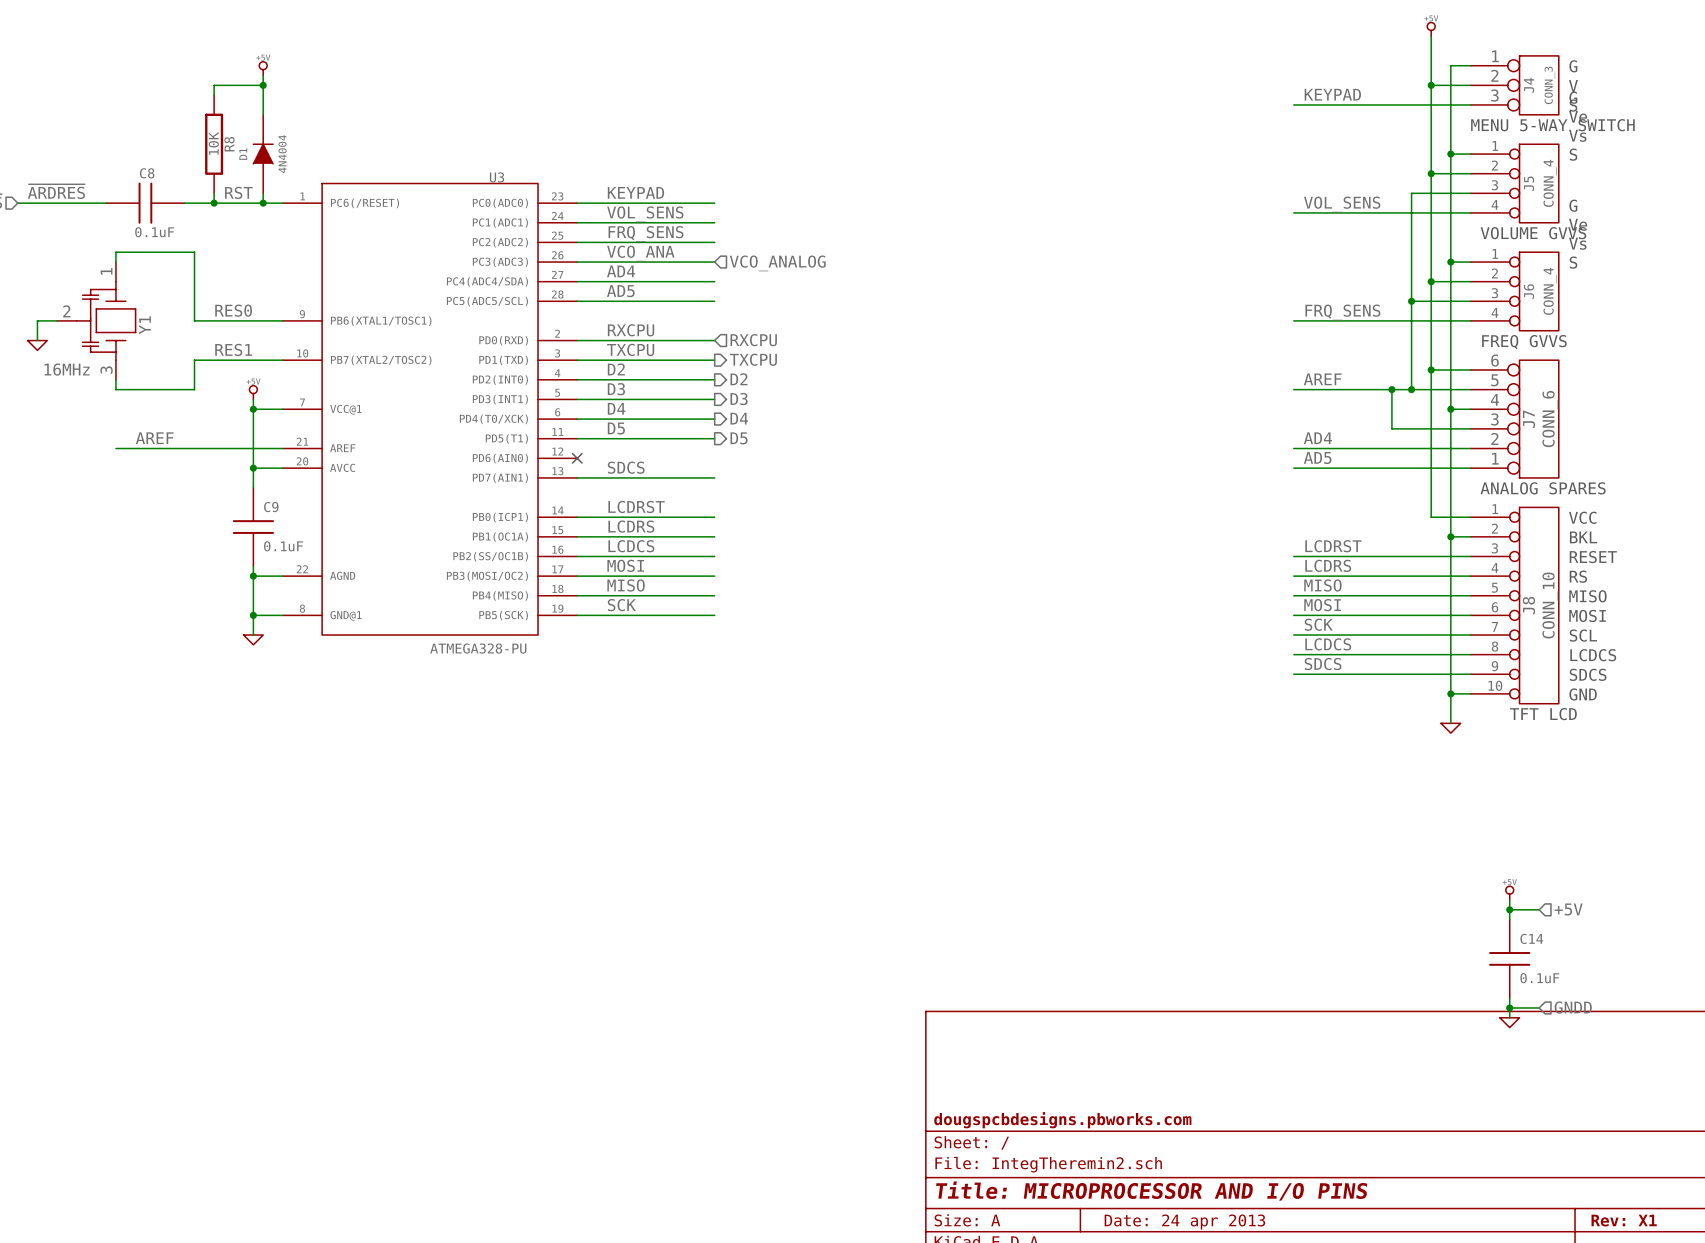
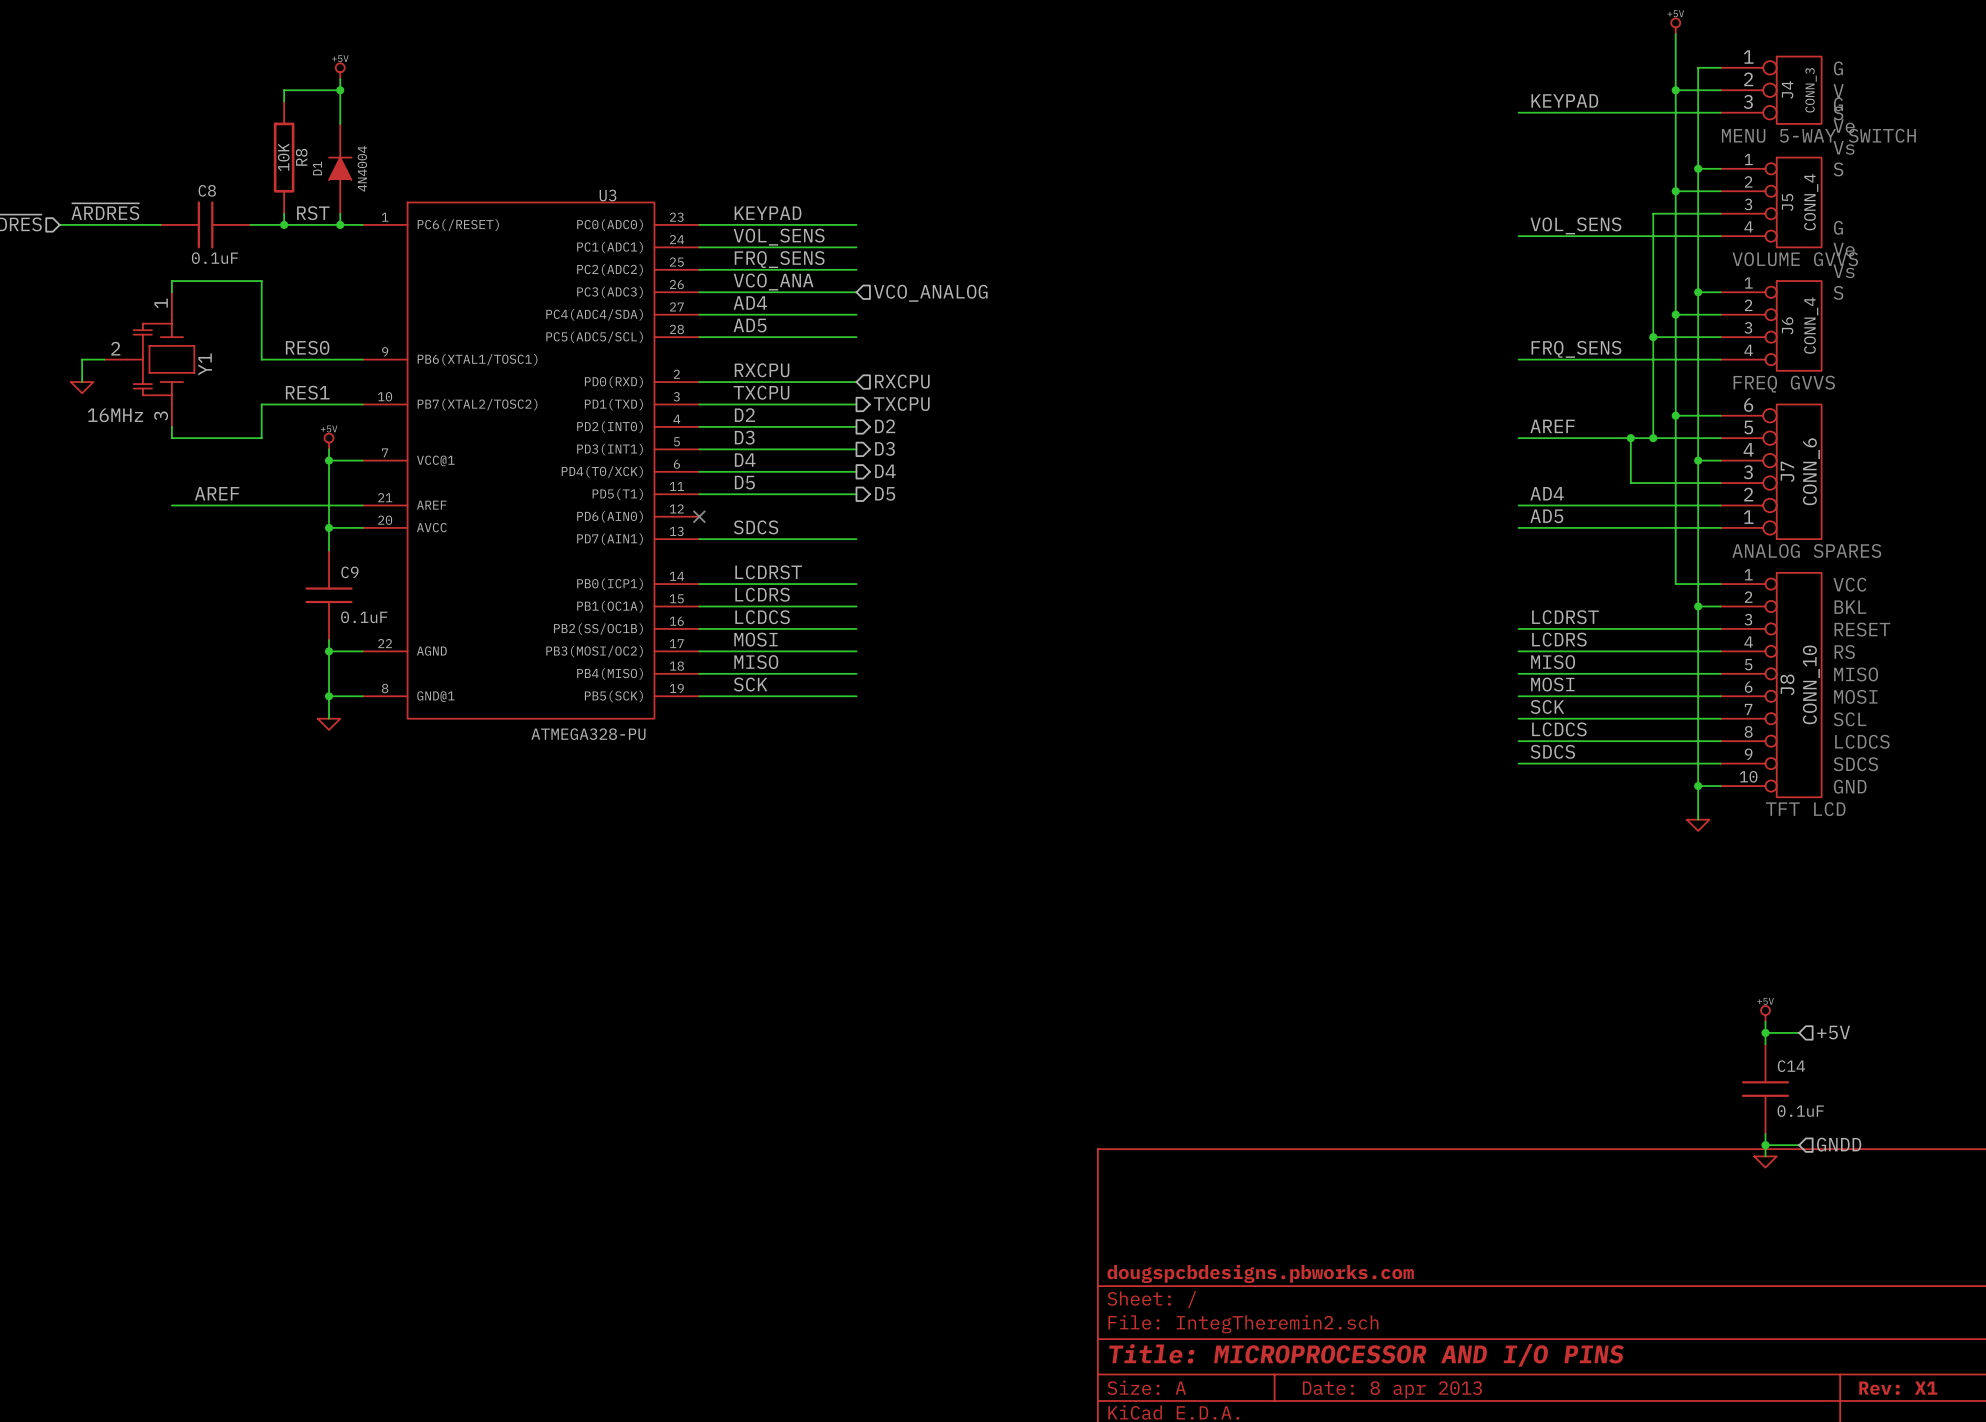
title block: Date: 24 apr 2013 (1184, 1222) -> Date: 8 apr 2013 (1392, 1389)

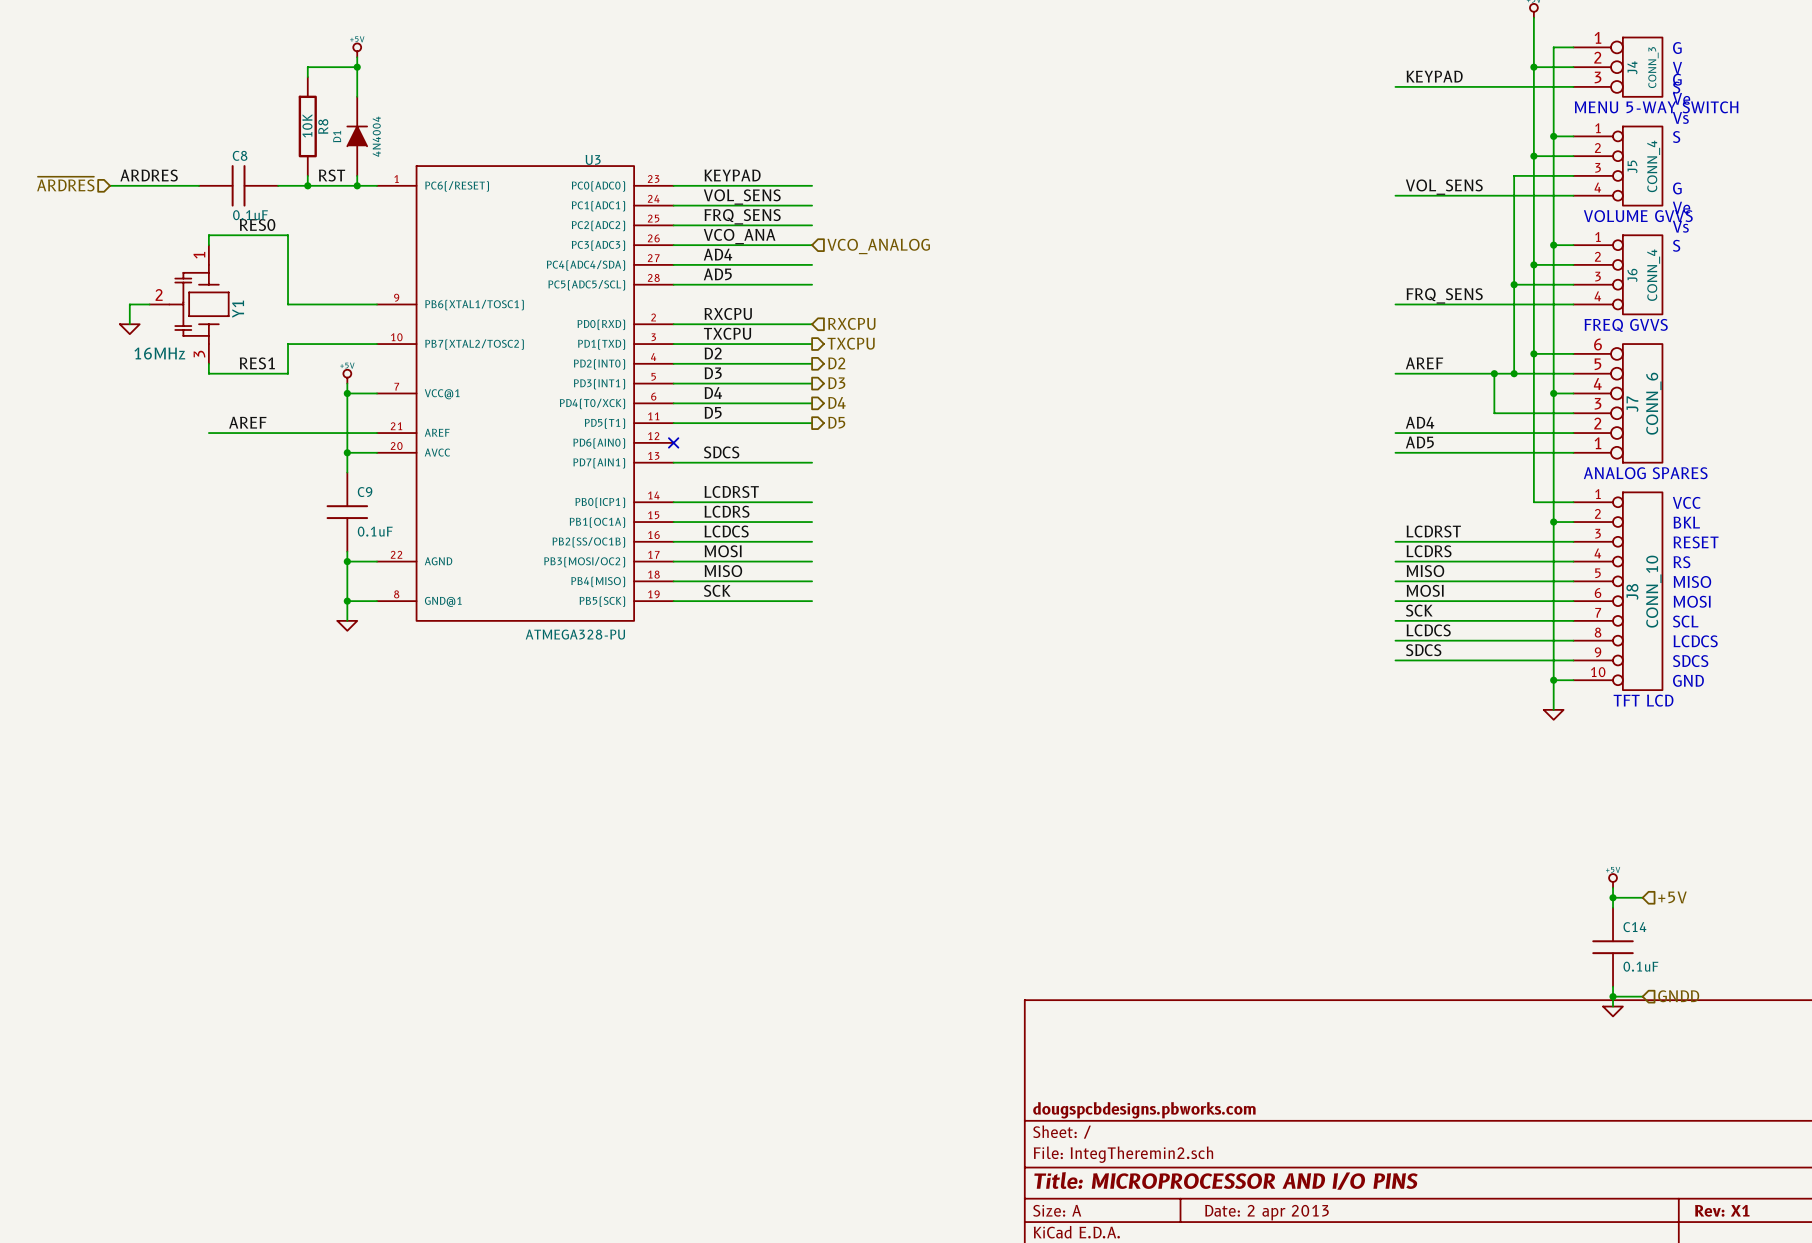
label: ~{ARDRES} (105, 211) -> ARDRES (149, 175)
label position: RES0 (307, 347) -> RES0 (257, 224)
label position: RES1 (307, 392) -> RES1 (257, 363)
title block: Date: 8 apr 2013 (1392, 1389) -> Date: 2 apr 2013 (1266, 1212)

